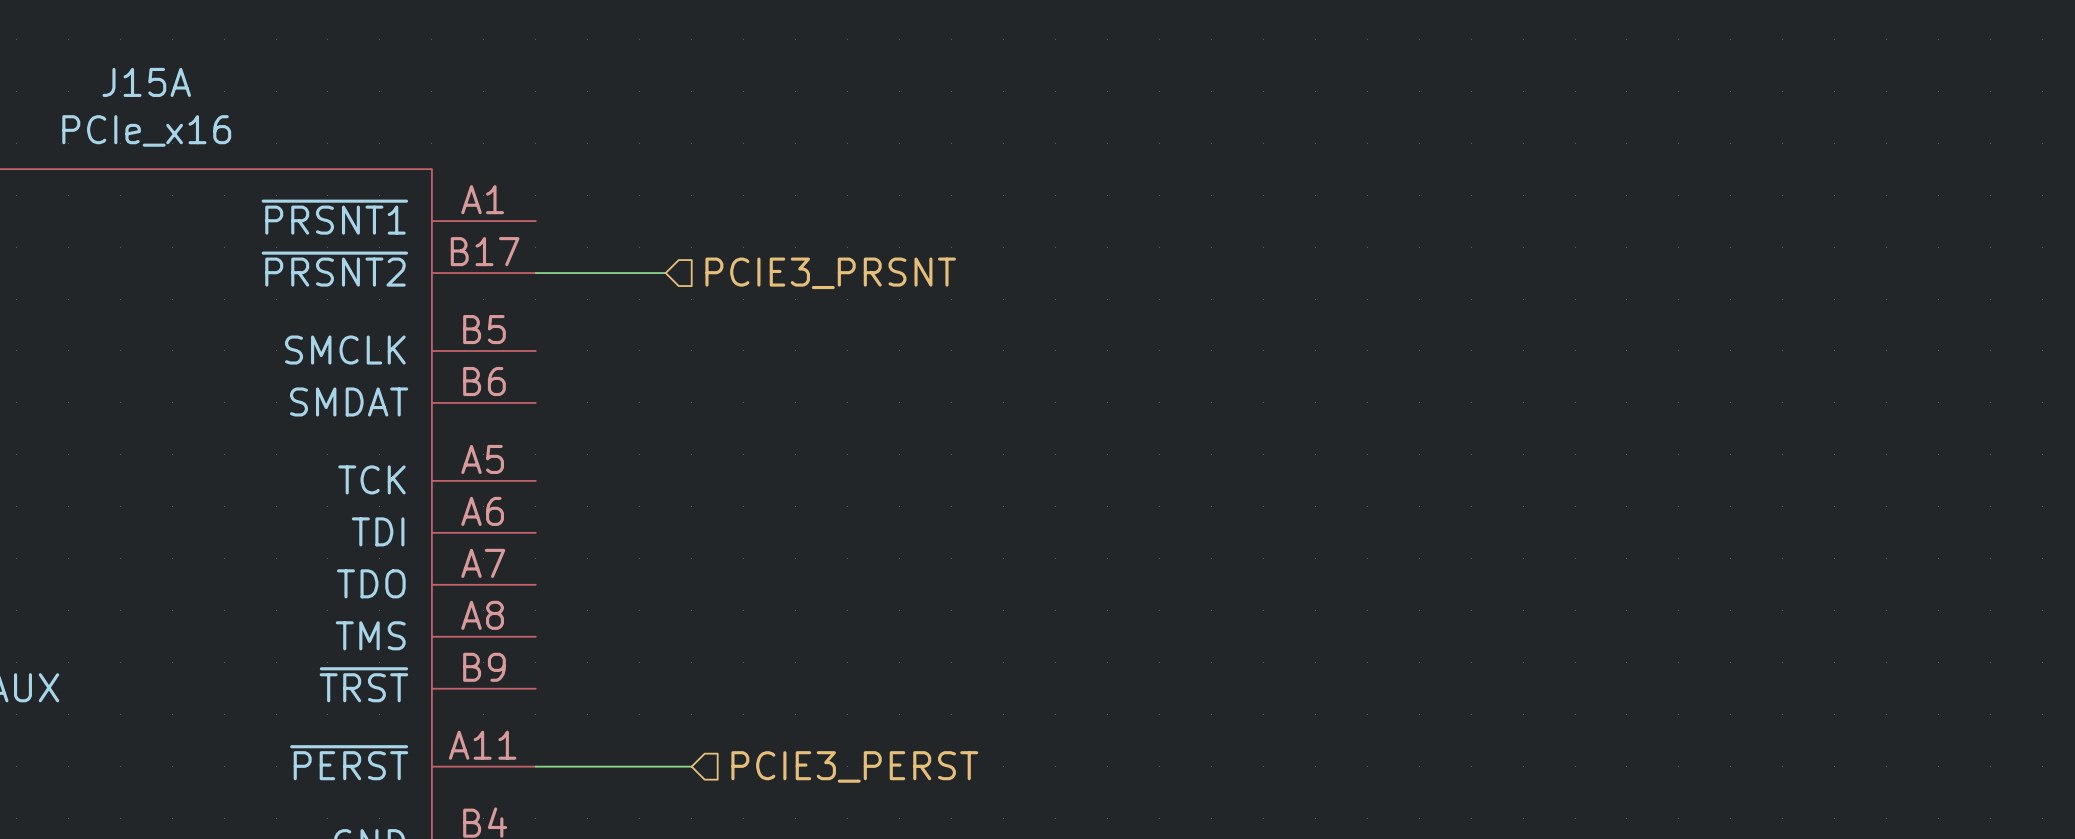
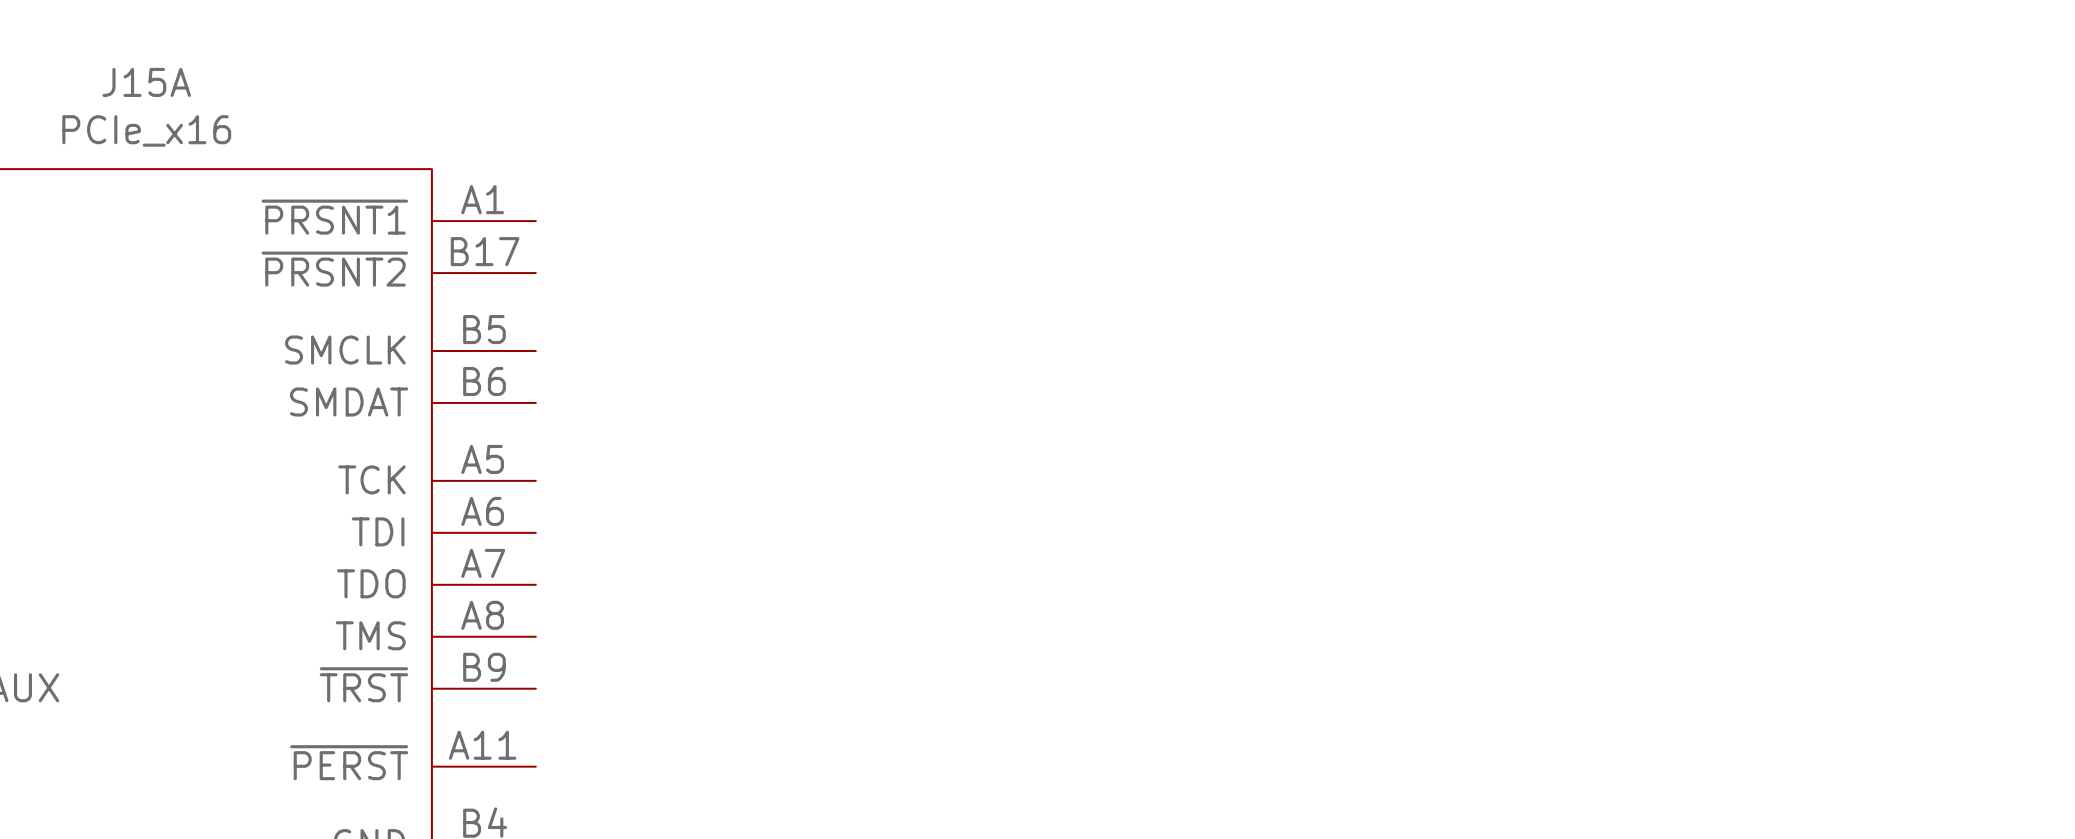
wire: (535, 273) (665, 273) -> none
hierarchical label: PCIE3_PRSNT (830, 273) -> none
wire: (535, 766) (691, 766) -> none
hierarchical label: PCIE3_PERST (854, 766) -> none

